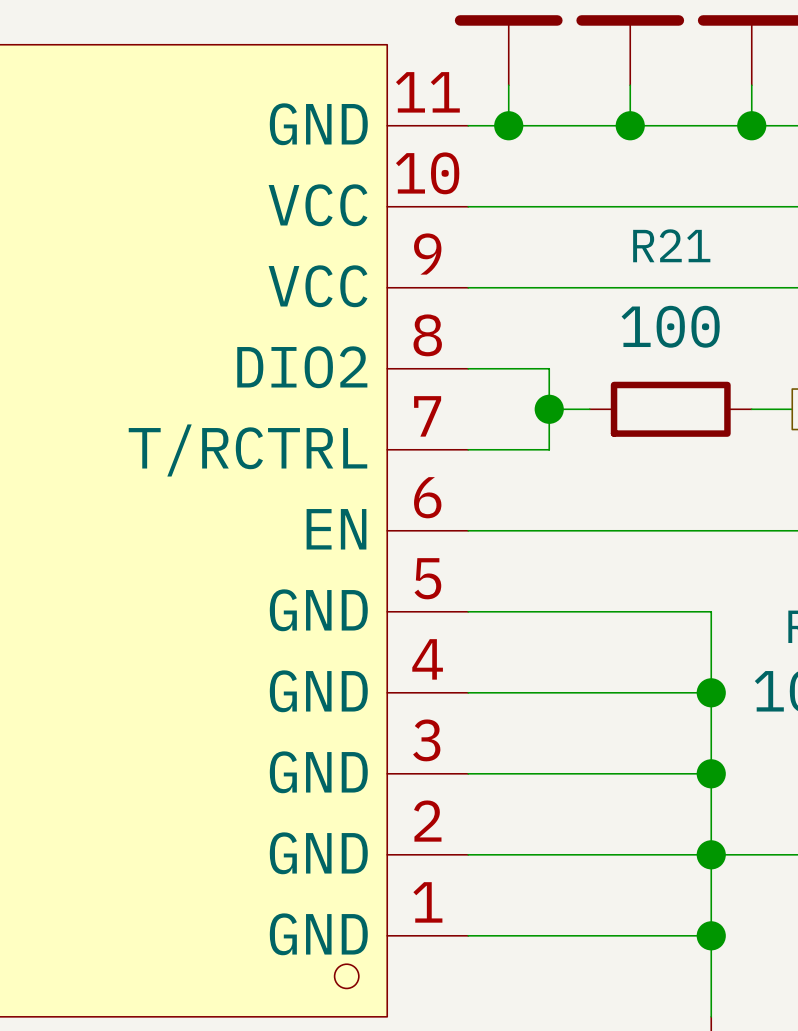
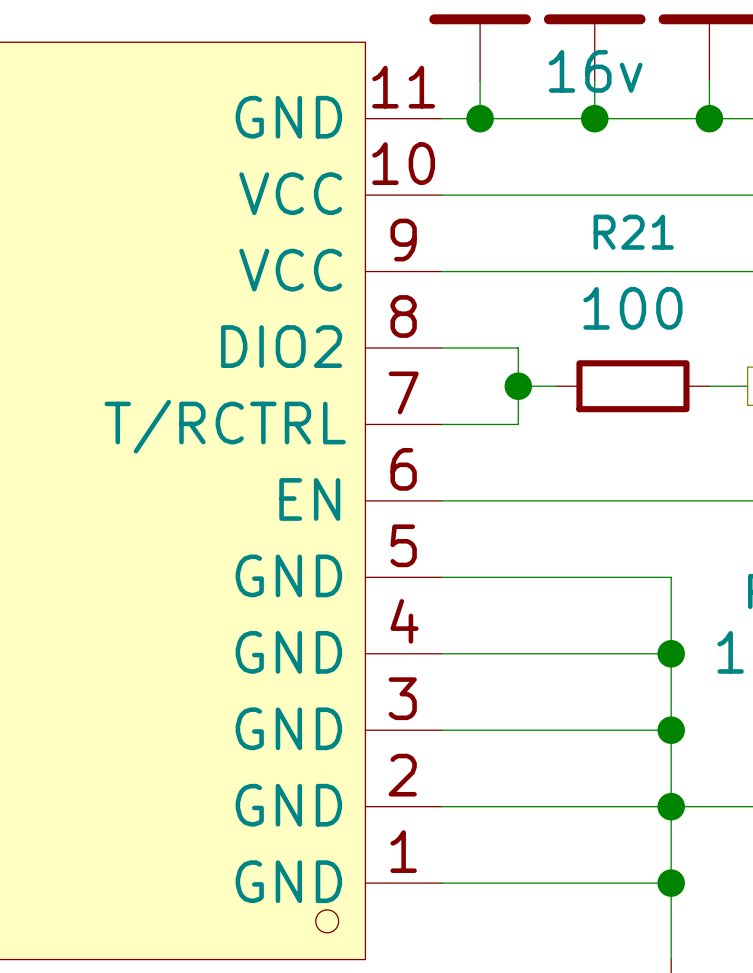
part text: none -> 16v (595, 71)

